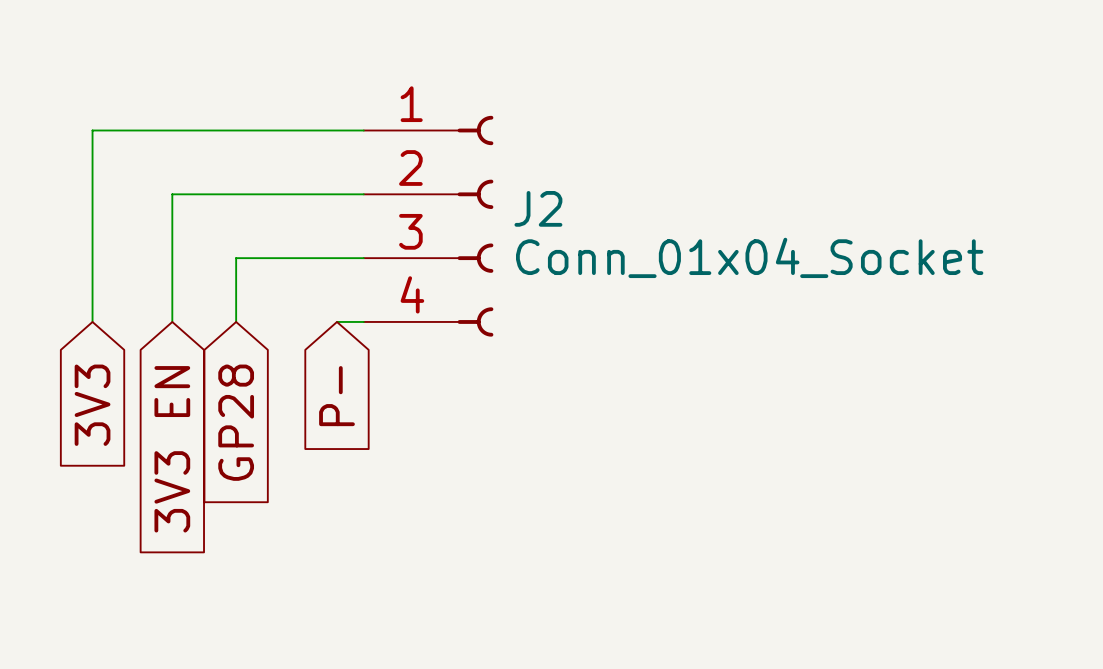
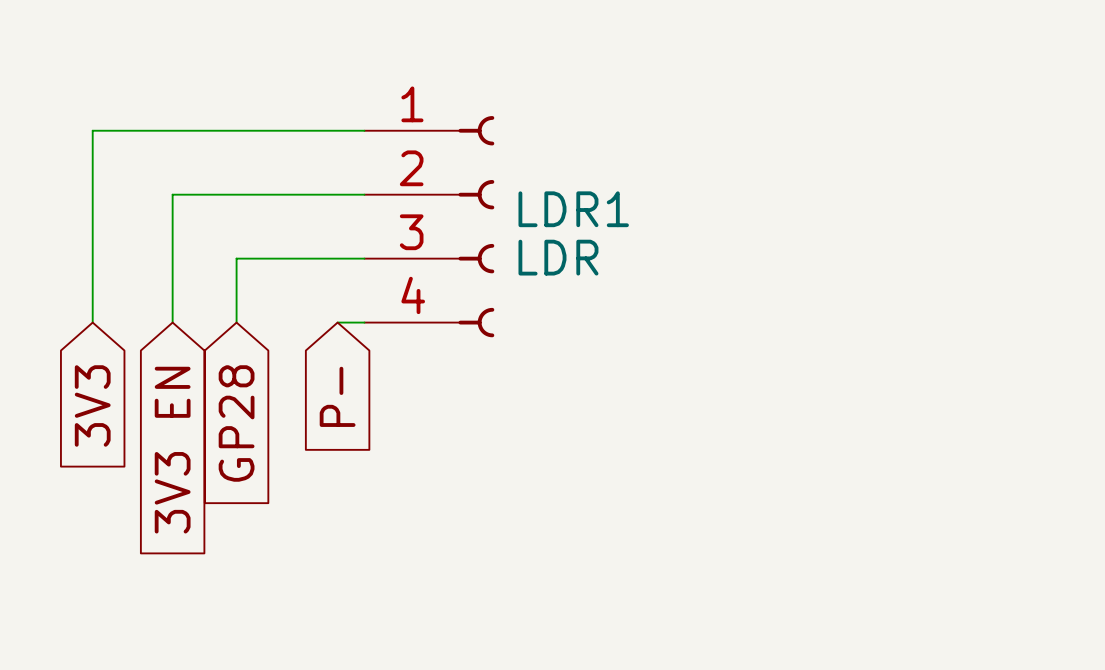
J2 name: J2 (538, 208) -> LDR1 (573, 209)
J2 value: Conn_01x04_Socket (749, 257) -> LDR (558, 257)

